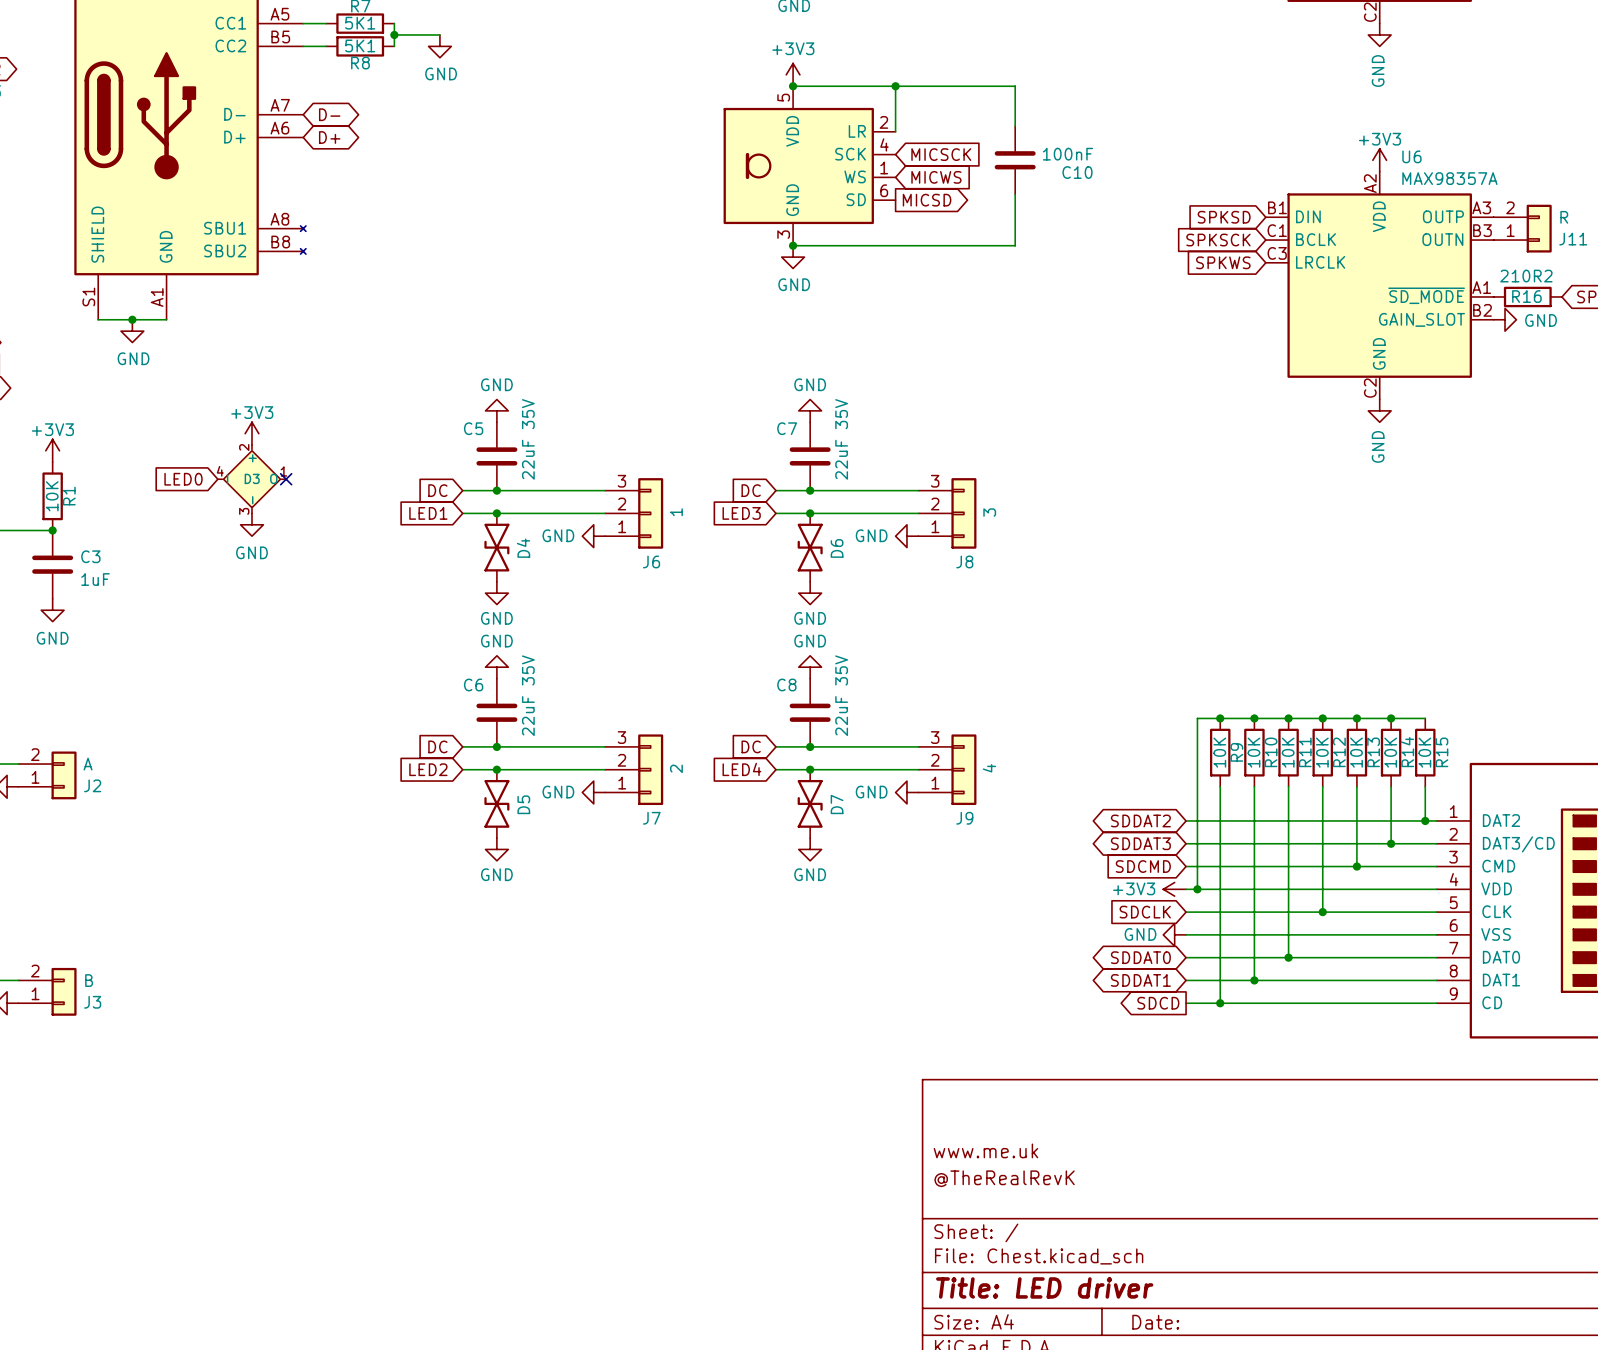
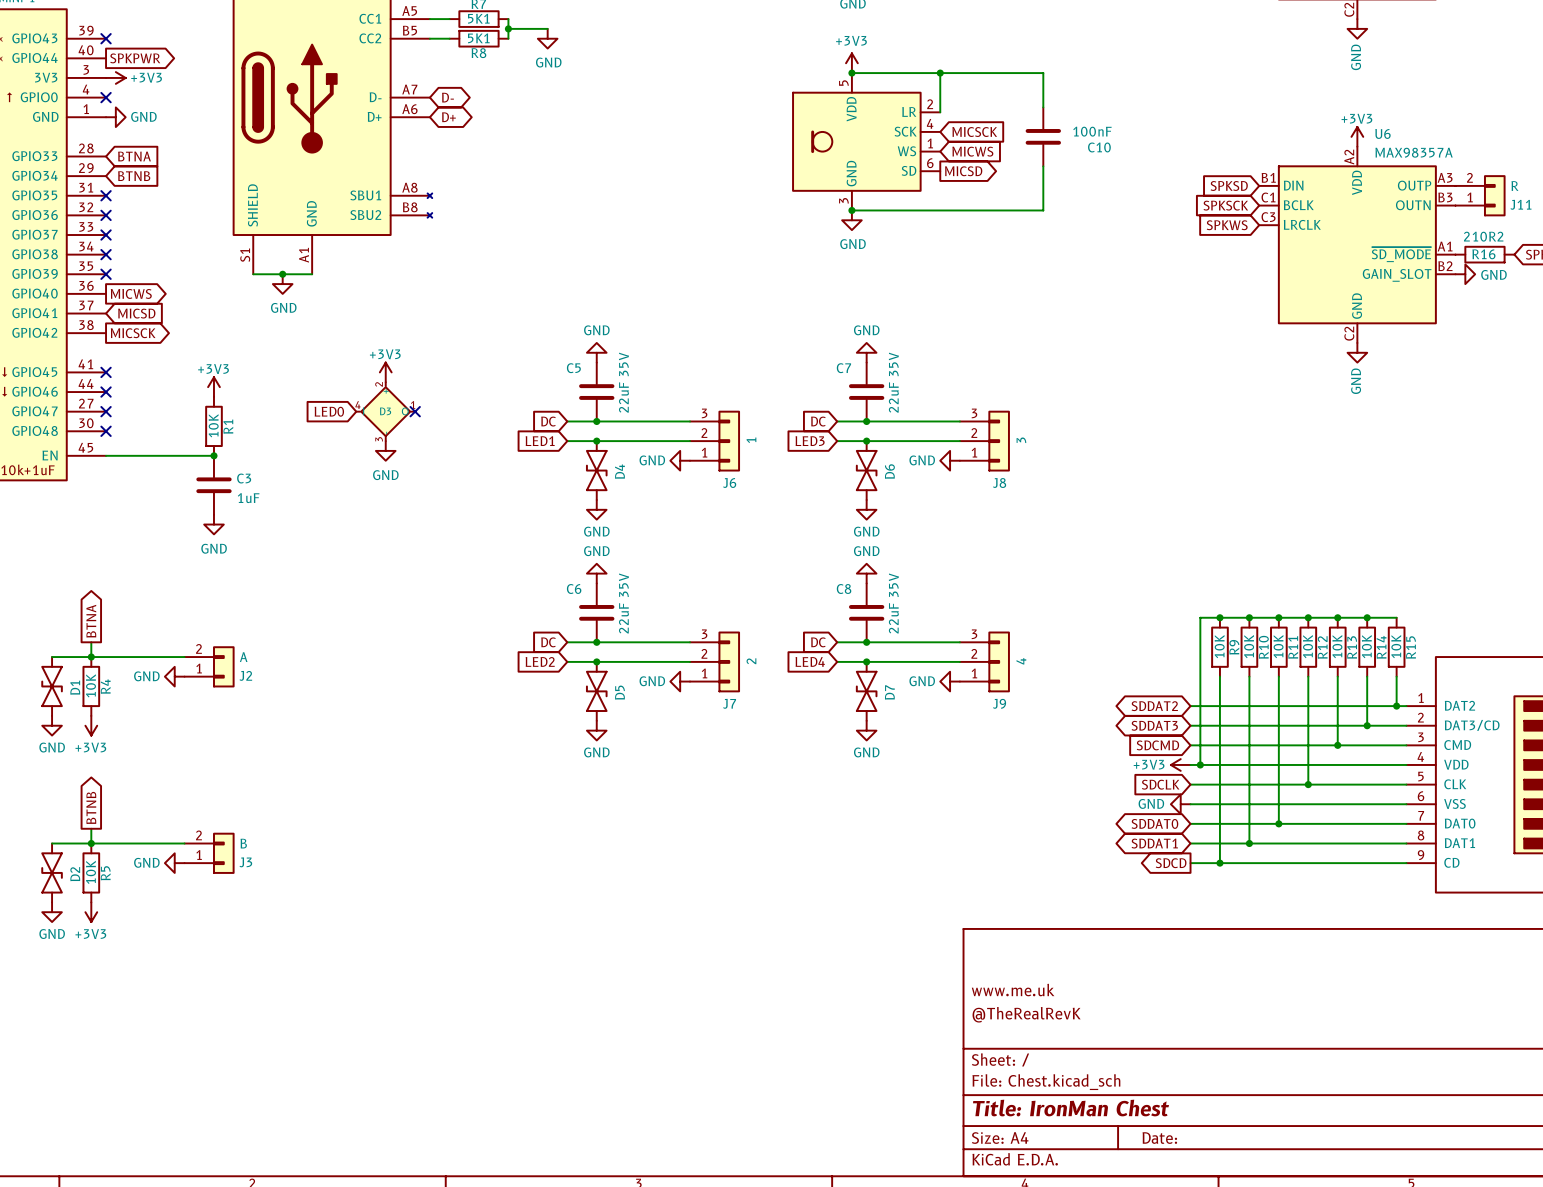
title block: Title: LED driver (1044, 1287) -> Title: IronMan Chest (1071, 1108)

